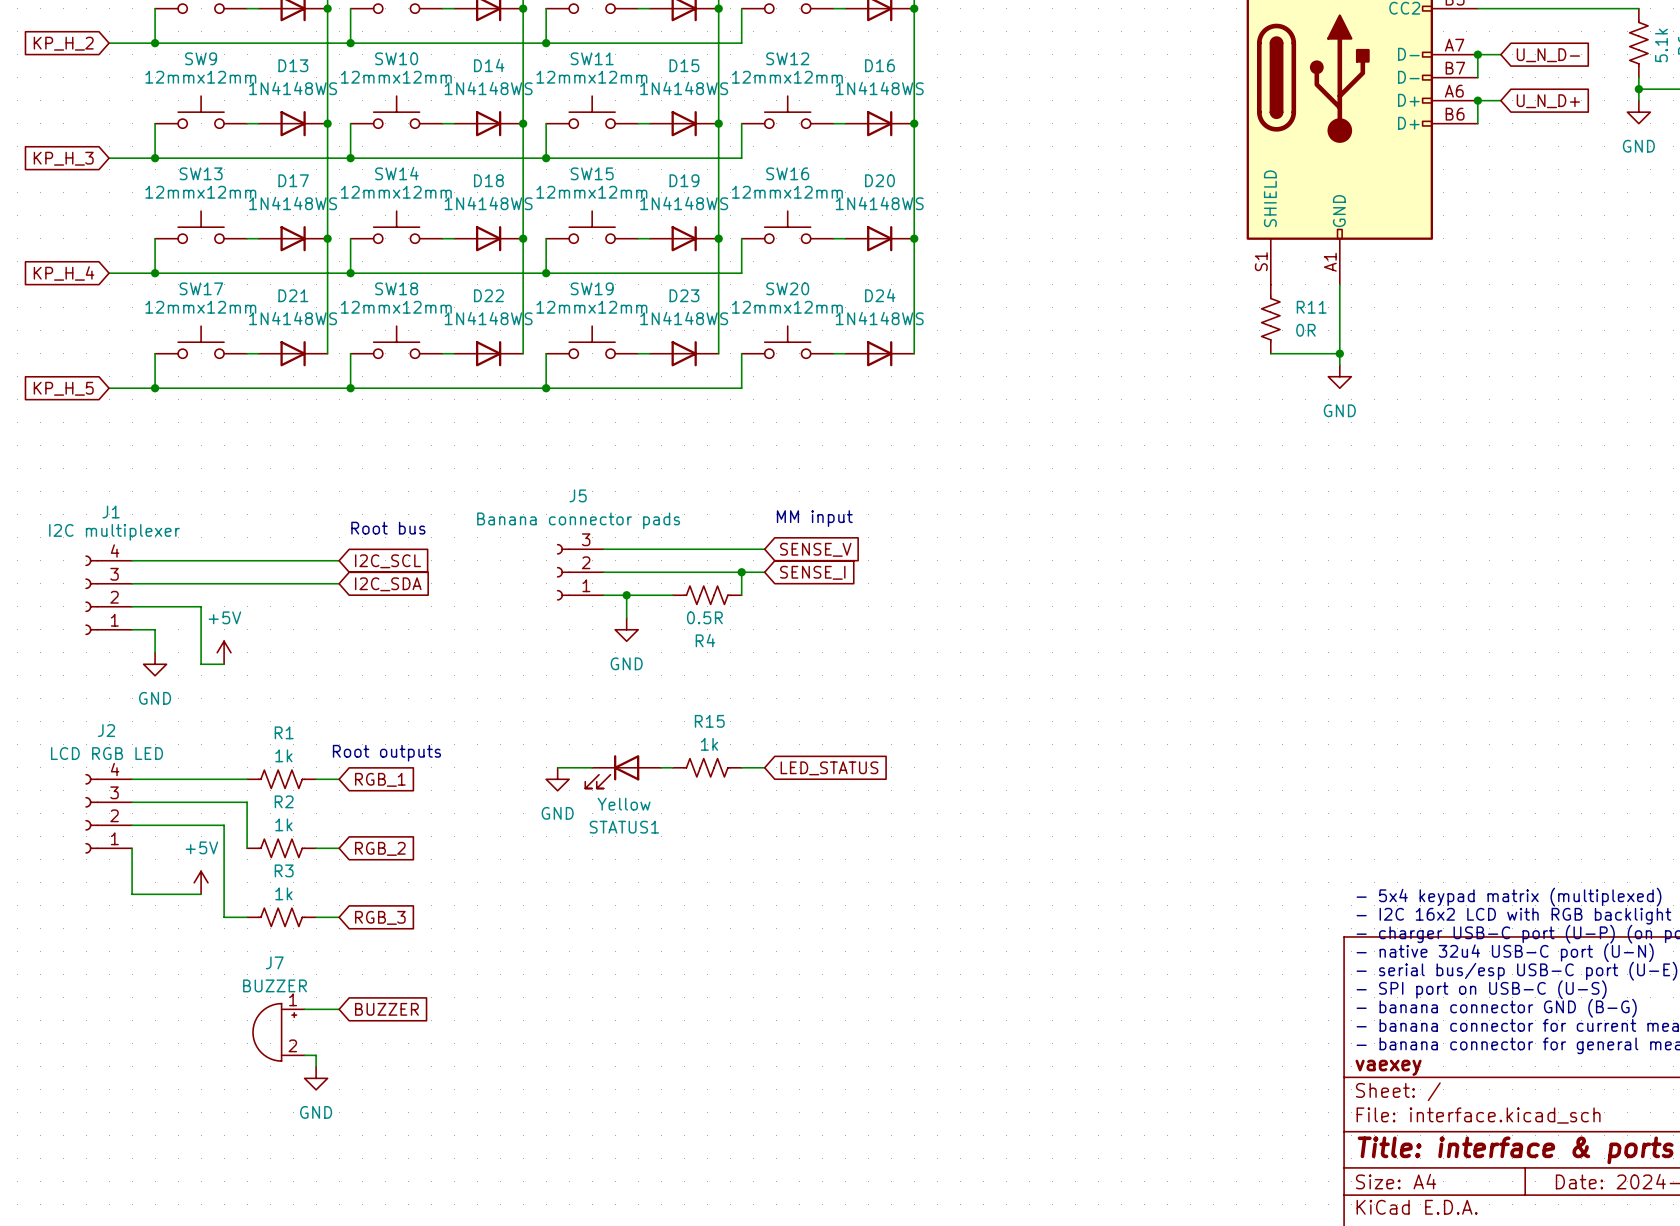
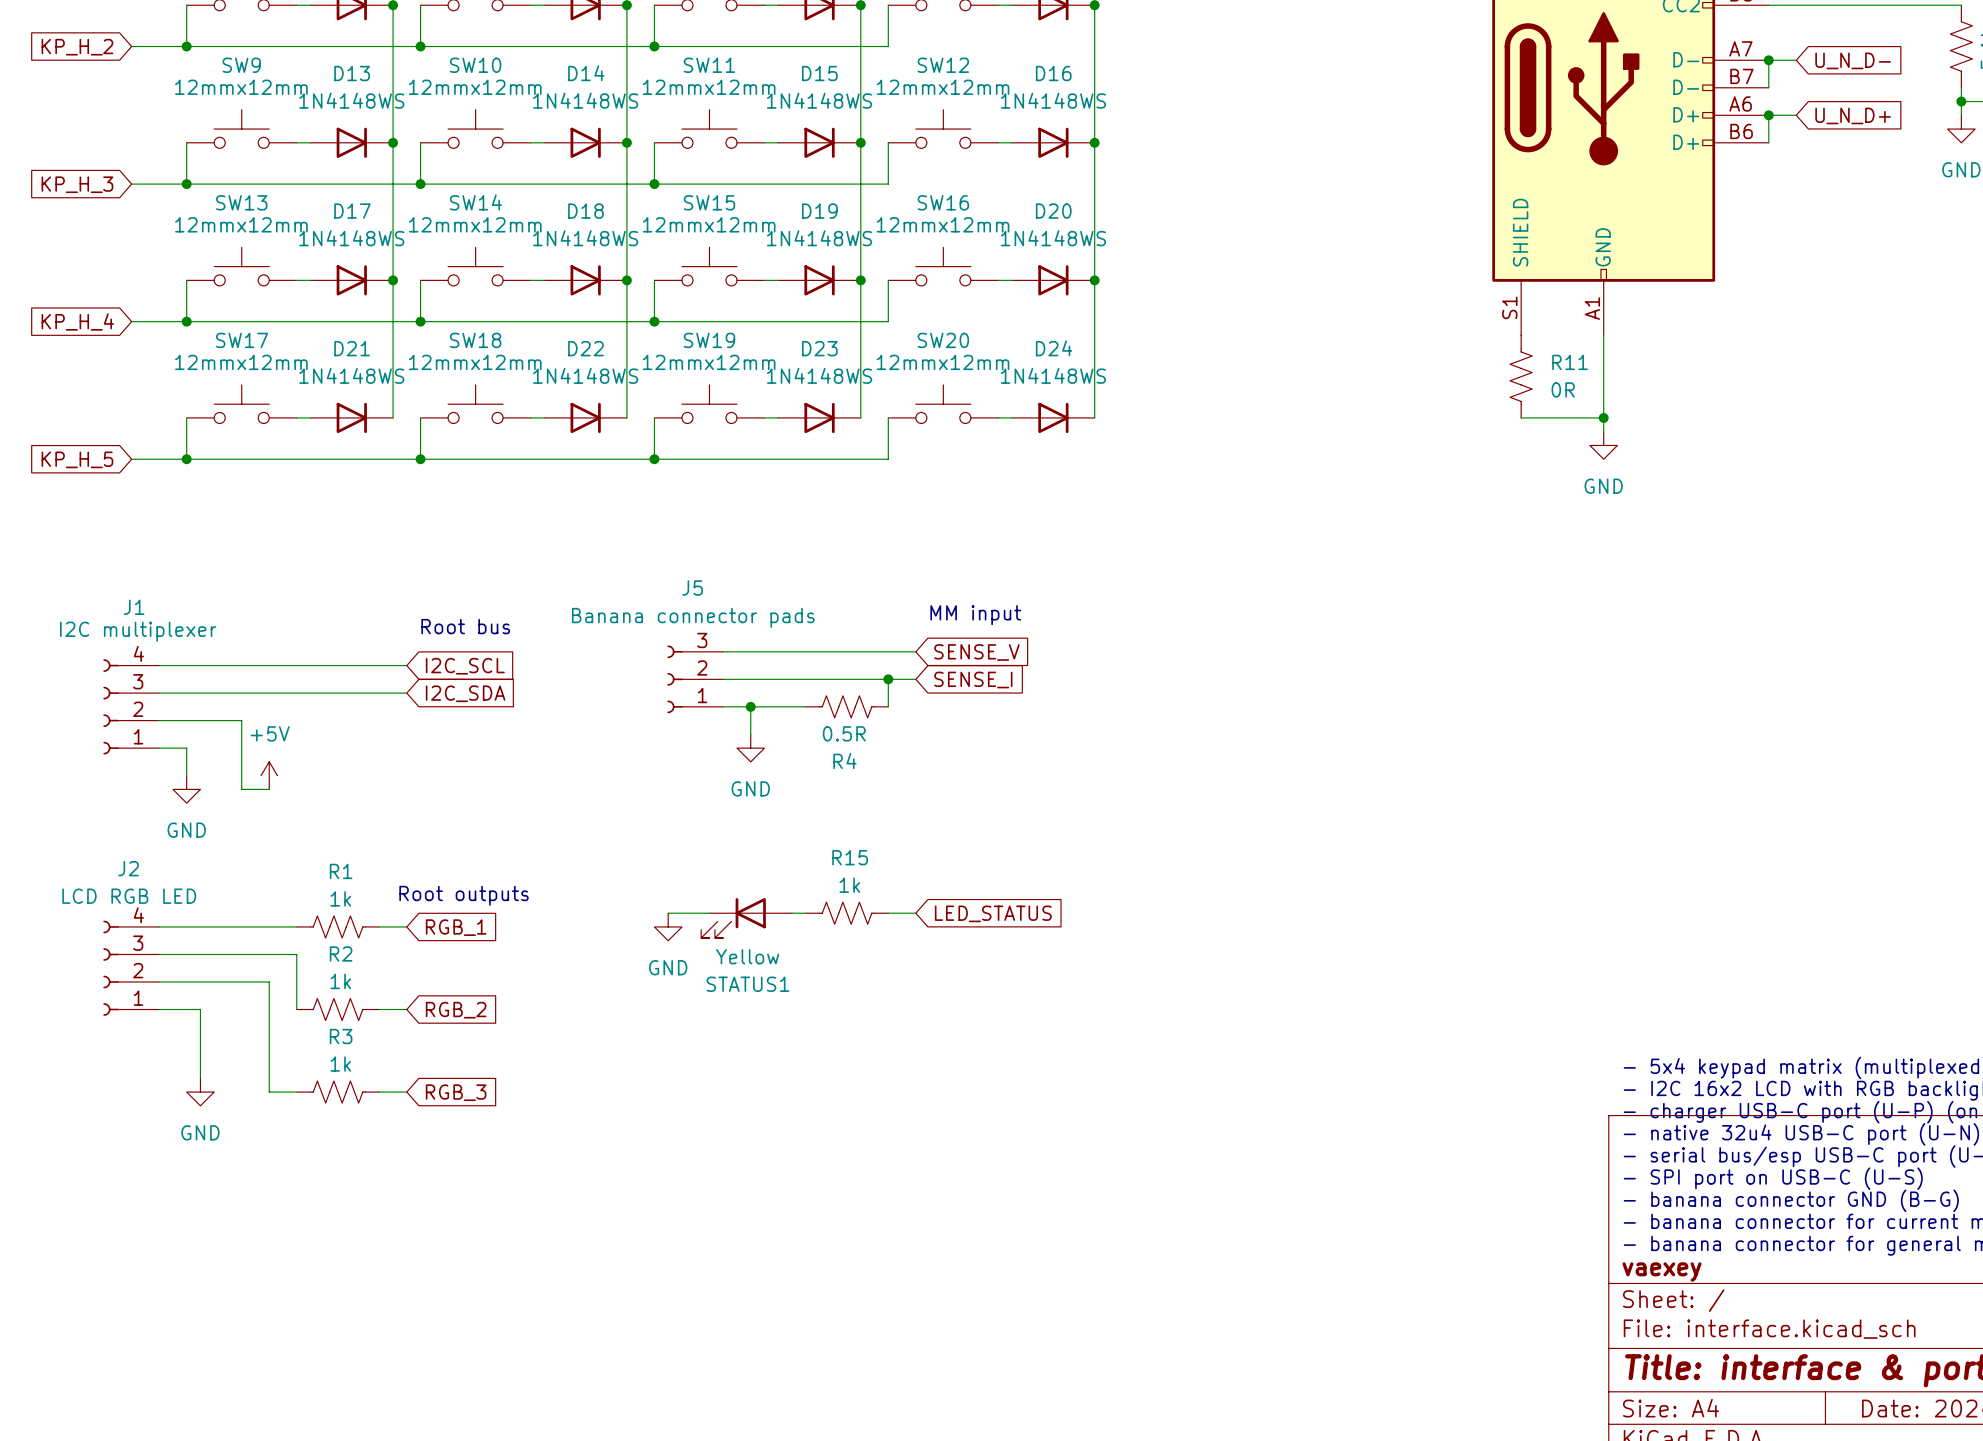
wire: (132, 848) (132, 894) (201, 894) -> (159, 1009) (200, 1009) (200, 1078)
power symbol: +5V (201, 882) -> none
wire: (304, 1009) (339, 1009) -> none
global label: BUZZER (386, 1009) -> none
J7: BUZZER (278, 1032) -> none
wire: (304, 1055) (316, 1055) (316, 1066) -> none
power symbol position: GND (316, 1078) -> GND (200, 1092)

